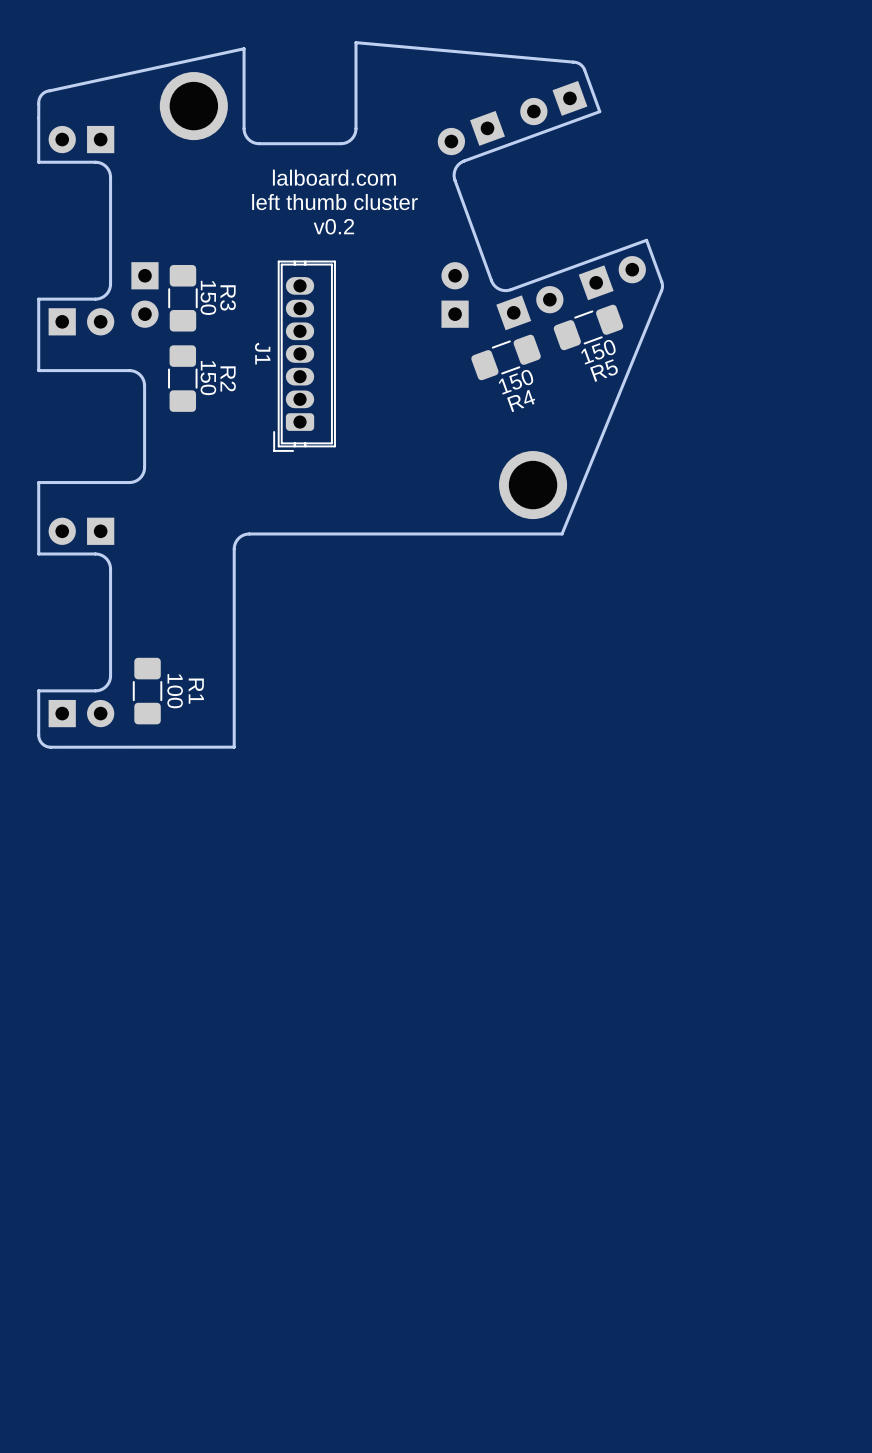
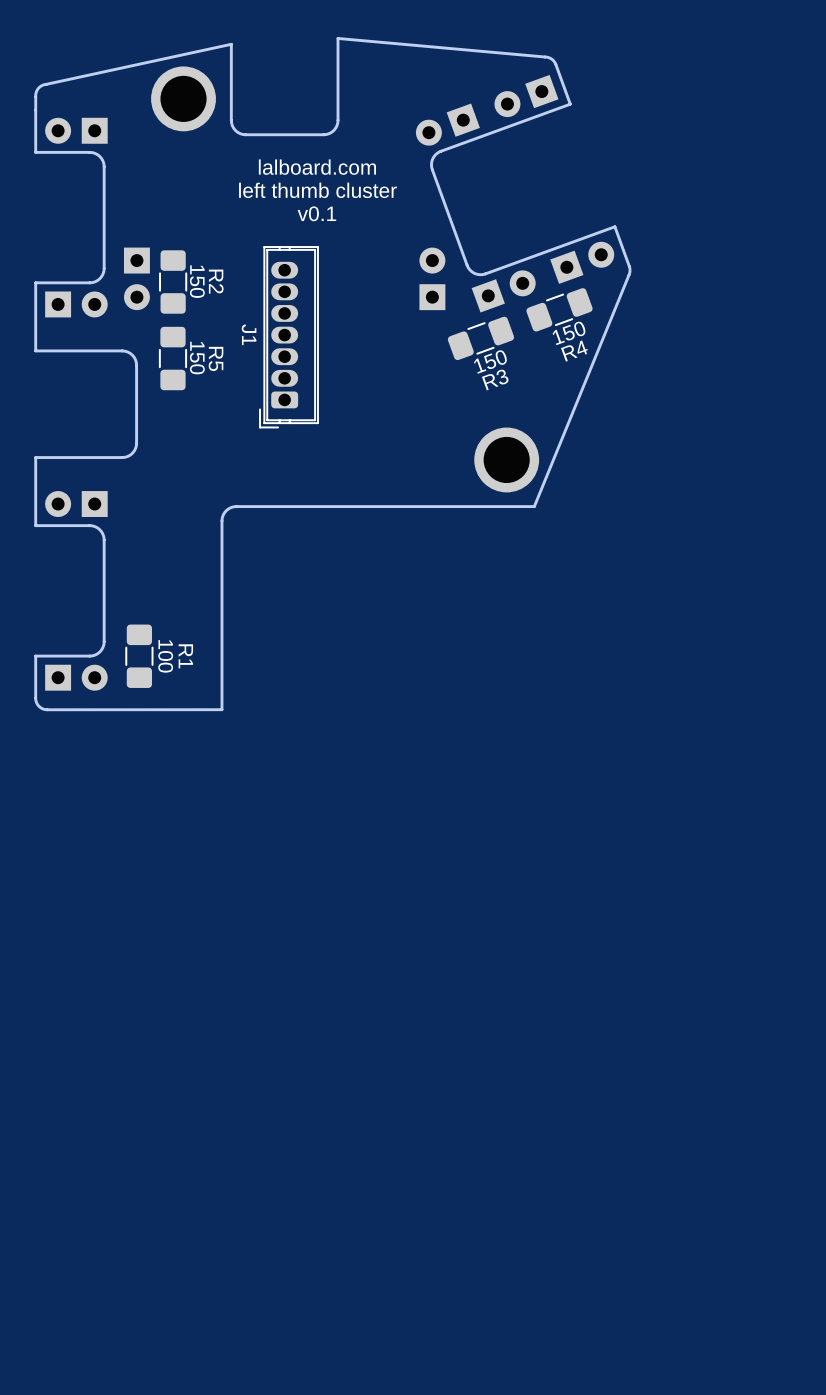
text: v0.2 (333, 226) -> v0.1 (316, 213)
R3 name: R3 (228, 297) -> R2 (216, 281)
R5 name: R5 (604, 370) -> R4 (574, 351)
R2 name: R2 (228, 378) -> R5 (216, 358)
R4 name: R4 (521, 400) -> R3 (495, 379)

